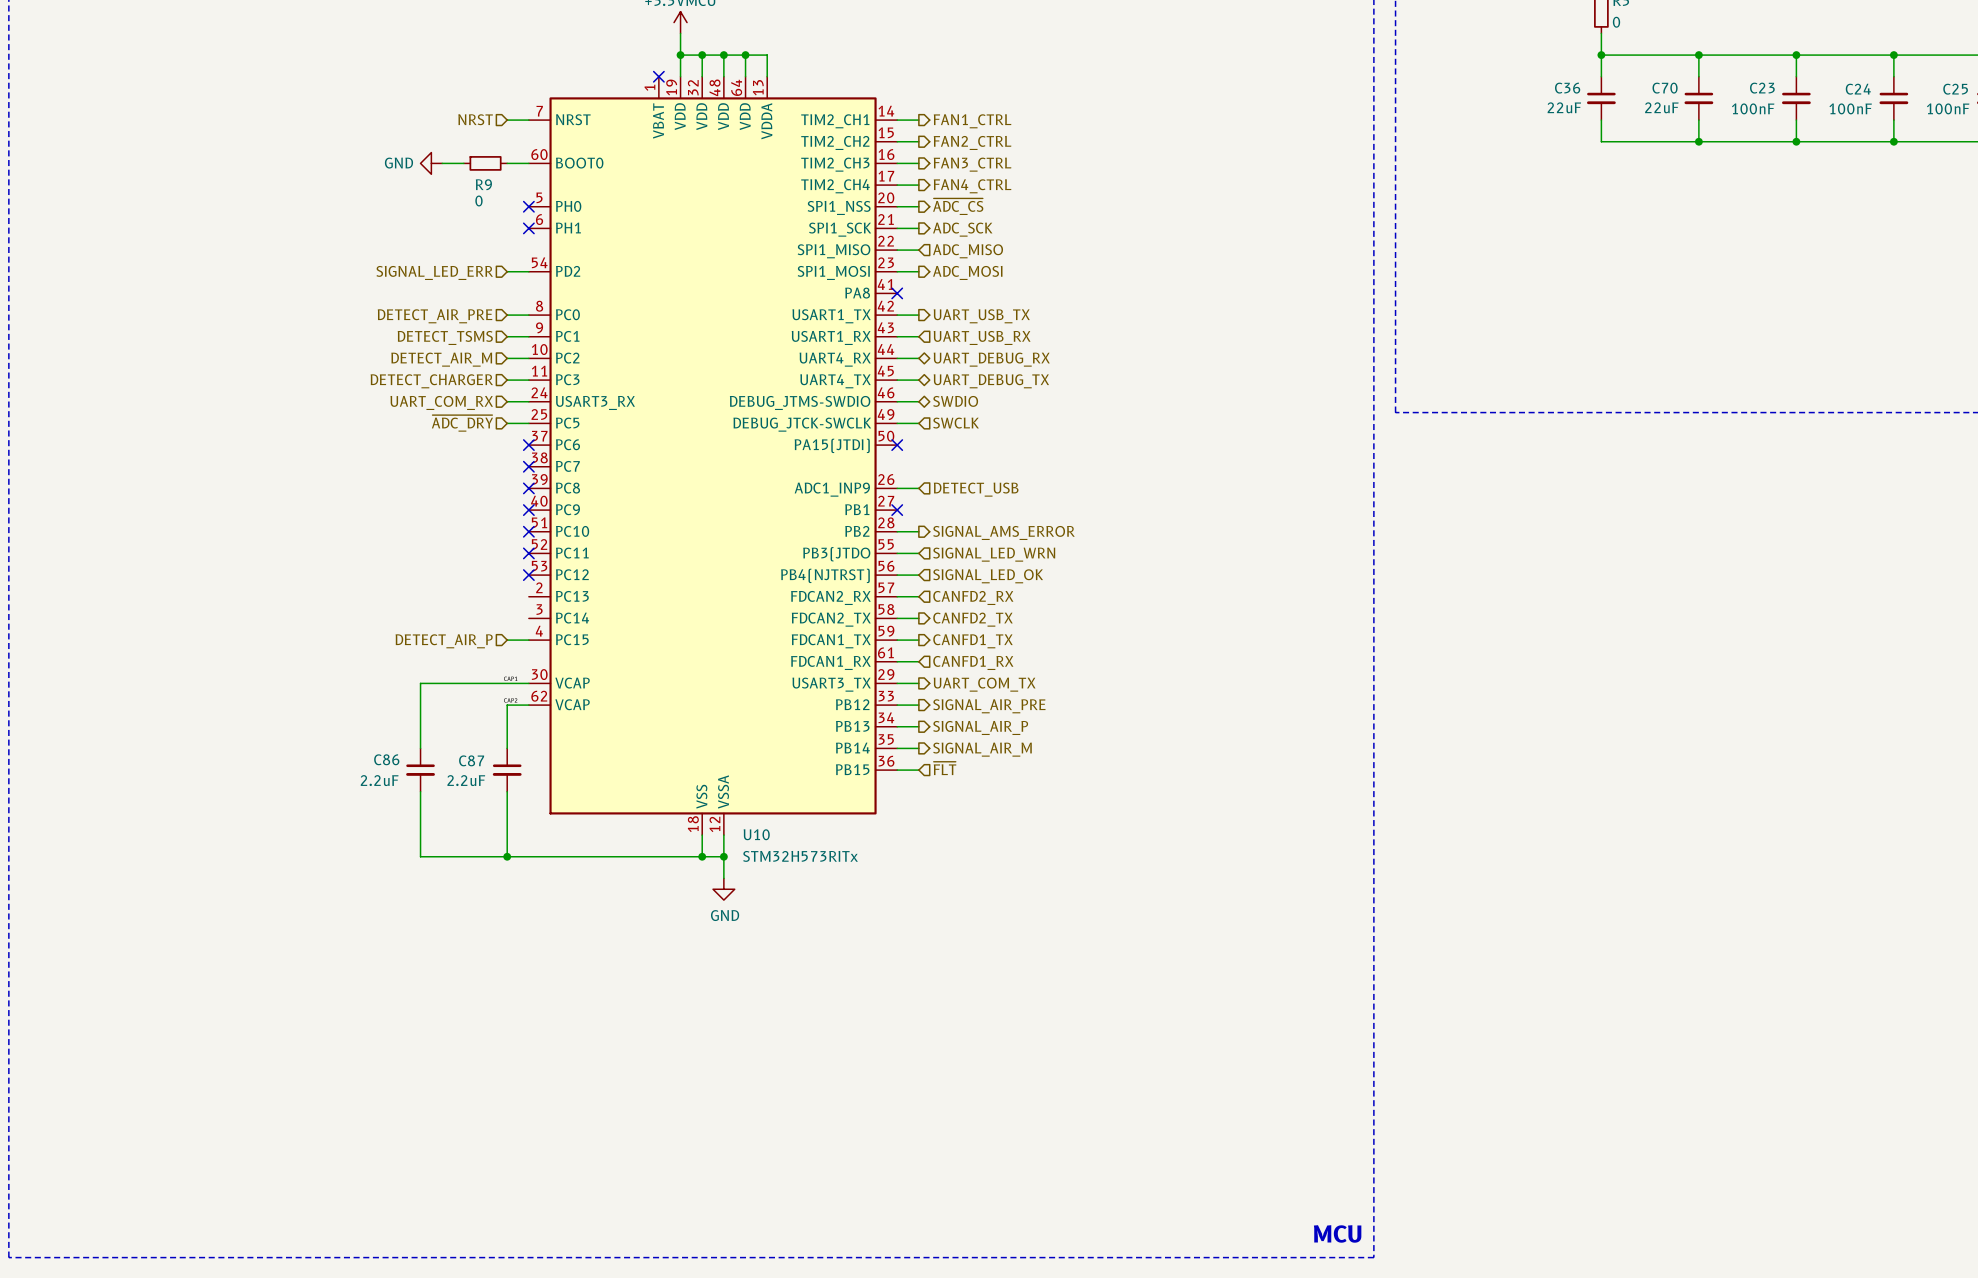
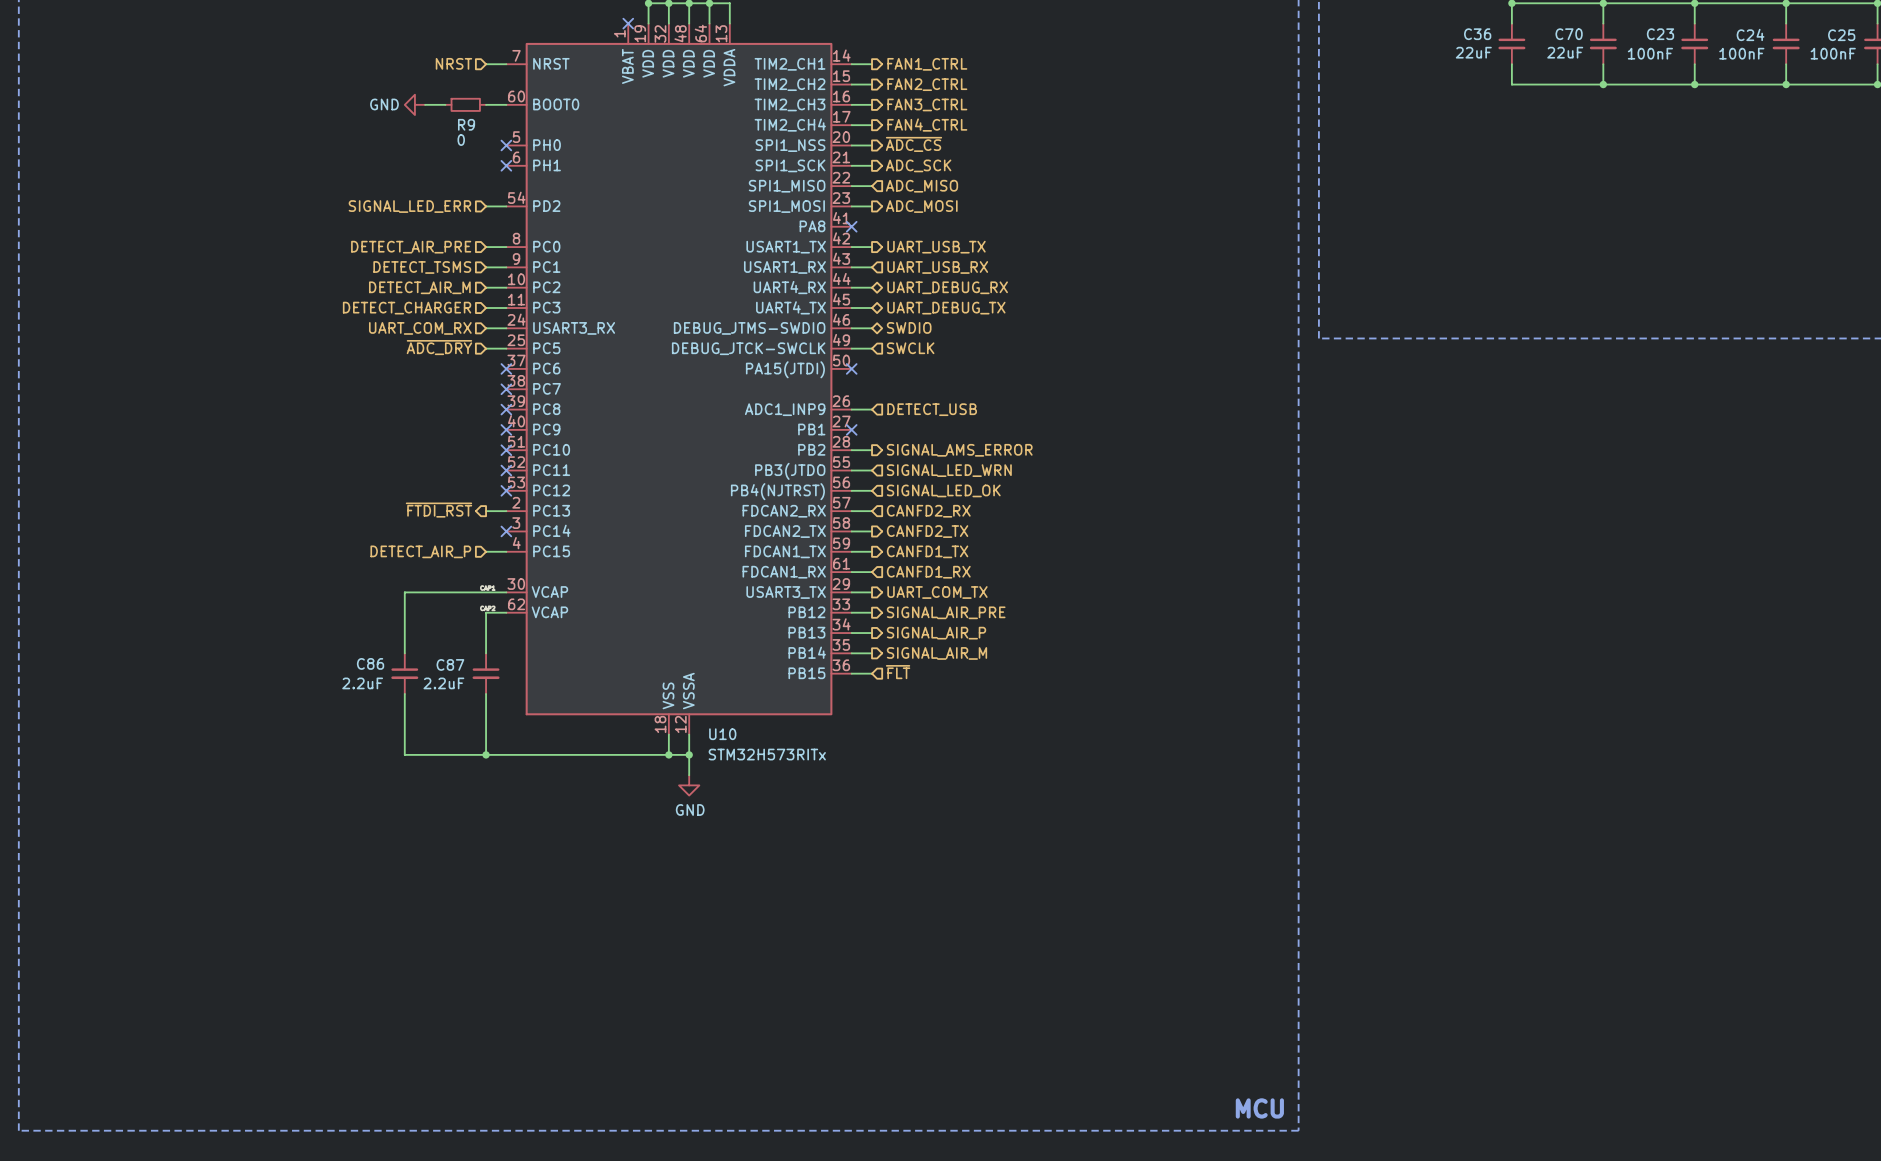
hierarchical label: none -> ~{FTDI_RST} (439, 510)
wire: none -> (486, 511) (506, 511)
no-connect mark: none -> (506, 531)

